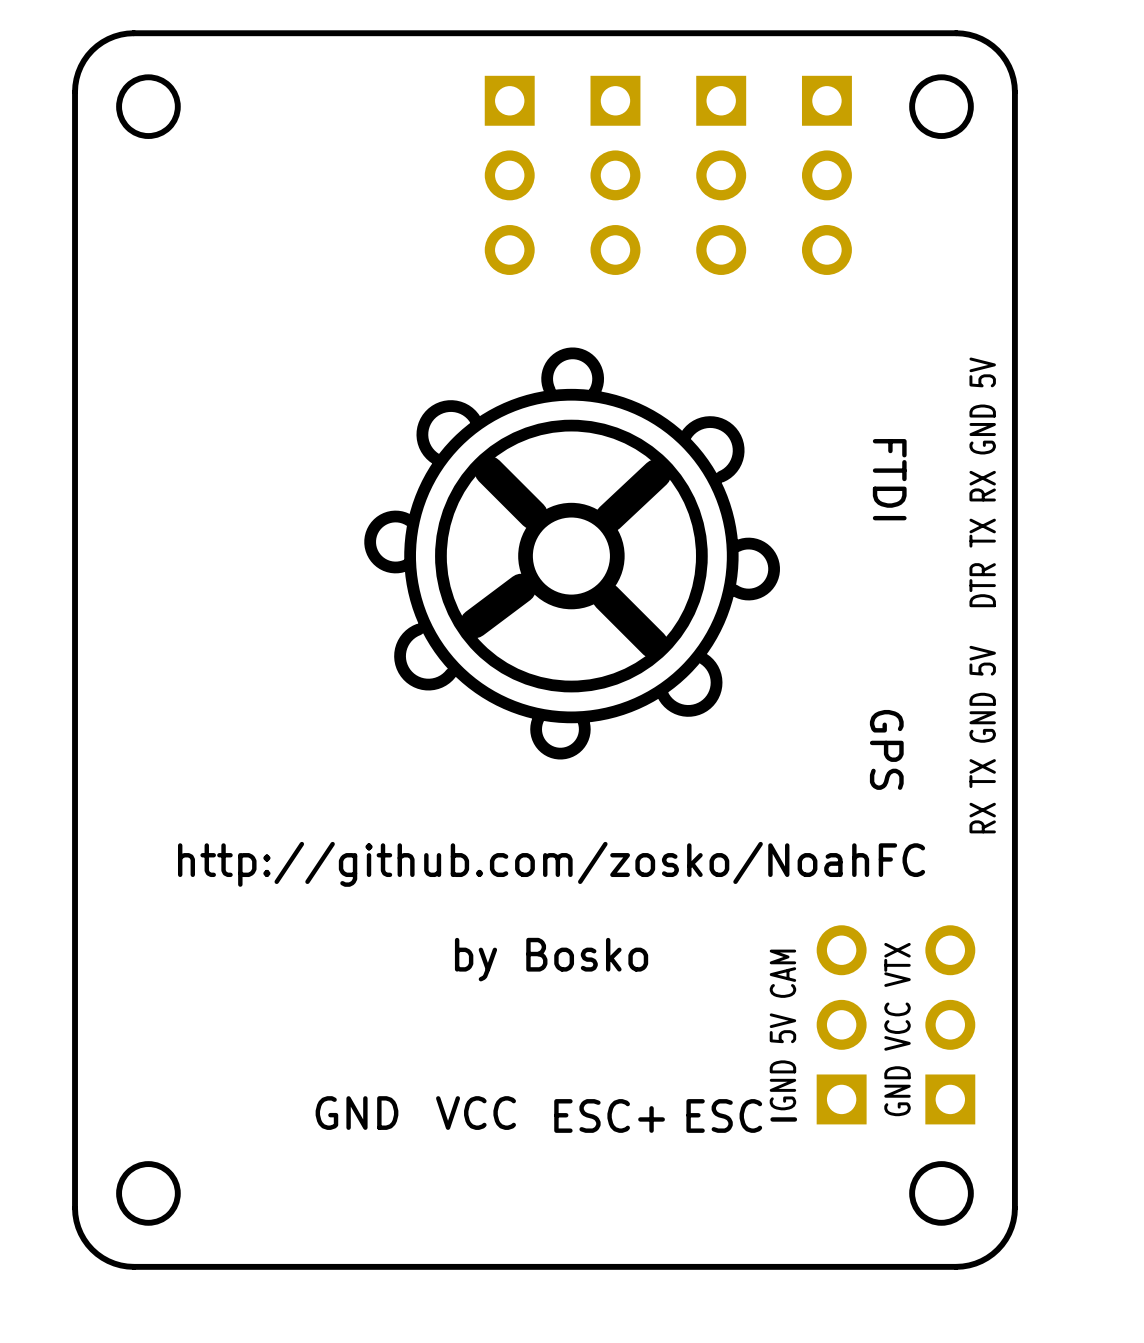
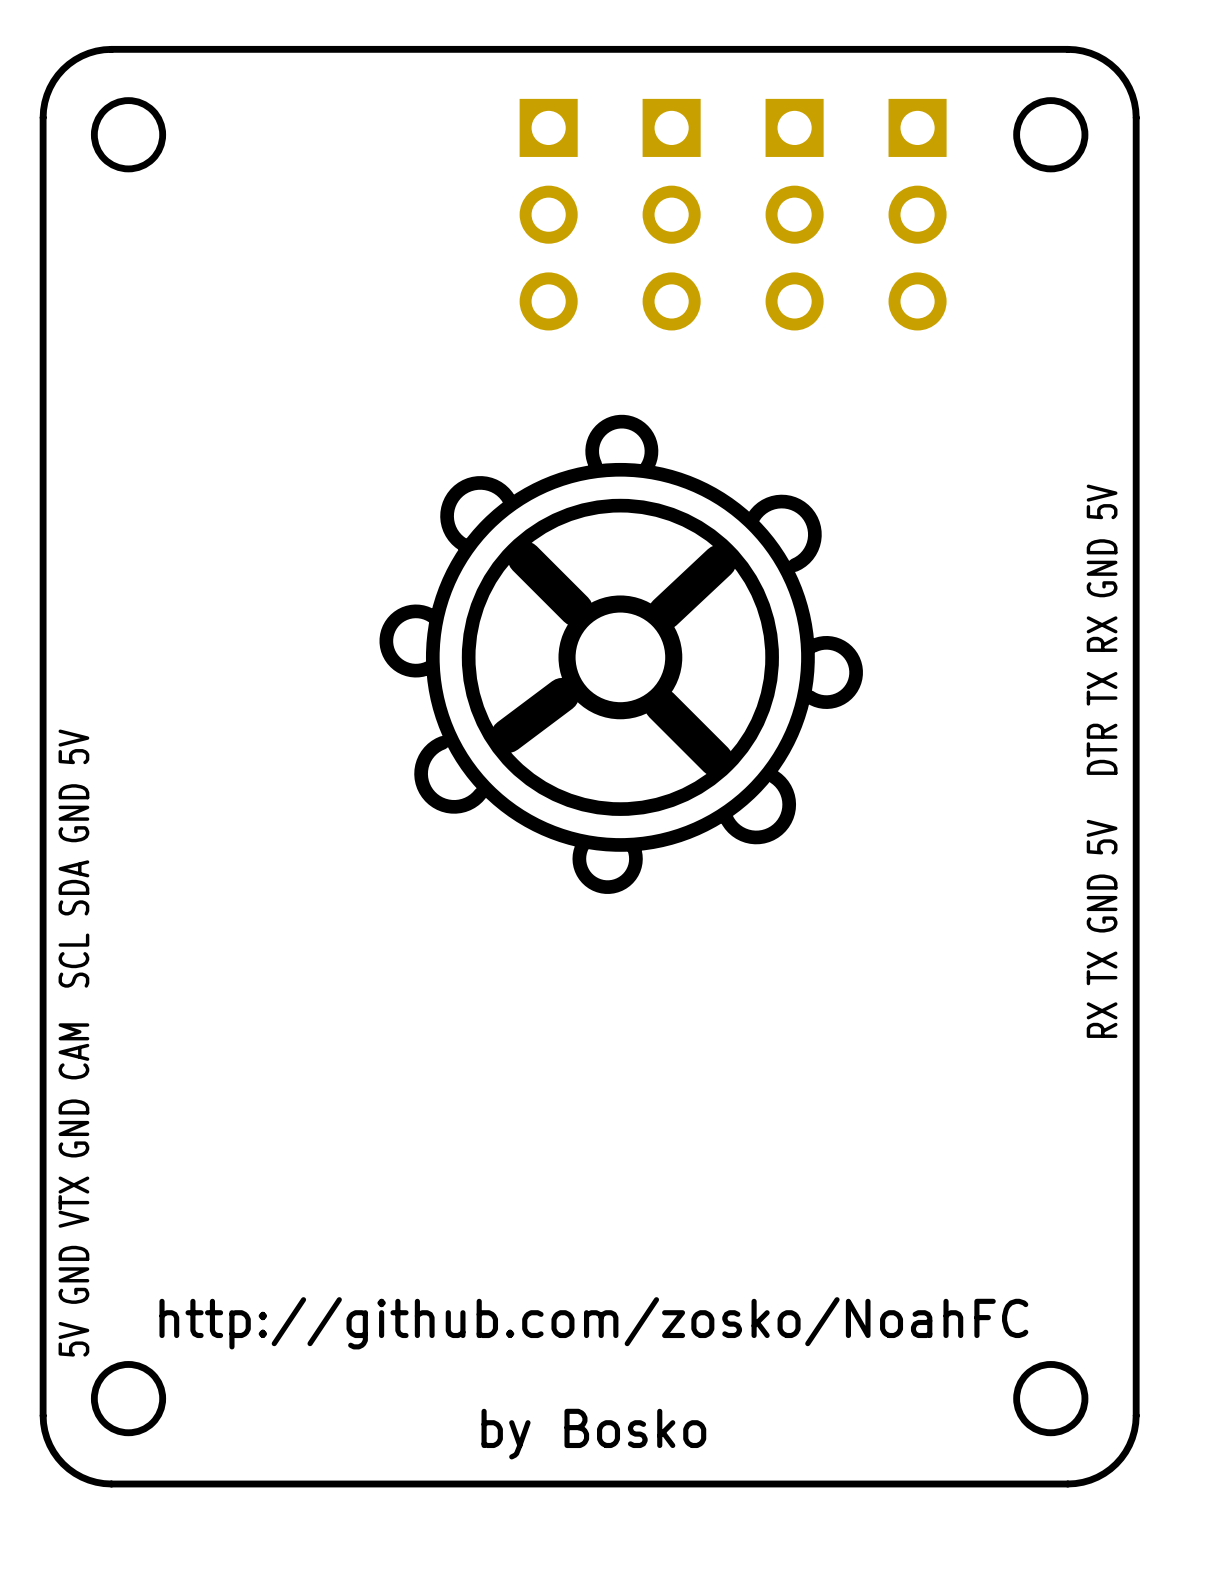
part: FTDI (889, 479) -> none
text position: DTR TX RX GND 5V (982, 482) -> DTR TX RX GND 5V (1102, 629)
text: none -> SCL SDA GND 5V (73, 858)
text position: RX TX GND 5V (982, 739) -> RX TX GND 5V (1102, 928)
part: GPS (886, 749) -> none
text position: http://github.com/zosko/NoahFC (551, 864) -> http://github.com/zosko/NoahFC (593, 1323)
text position: by Bosko (551, 959) -> by Bosko (593, 1434)
text: none -> 5V GND VTX GND CAM (73, 1189)
part: (841, 1024) -> none
part: (950, 1024) -> none
text: GND 5V CAM (782, 1029) -> none
text: GND VCC VTX (897, 1029) -> none
part: GND (356, 1113) -> none
part: VCC (476, 1113) -> none
part: ESC+ (609, 1115) -> none
part: ESC- (741, 1115) -> none

